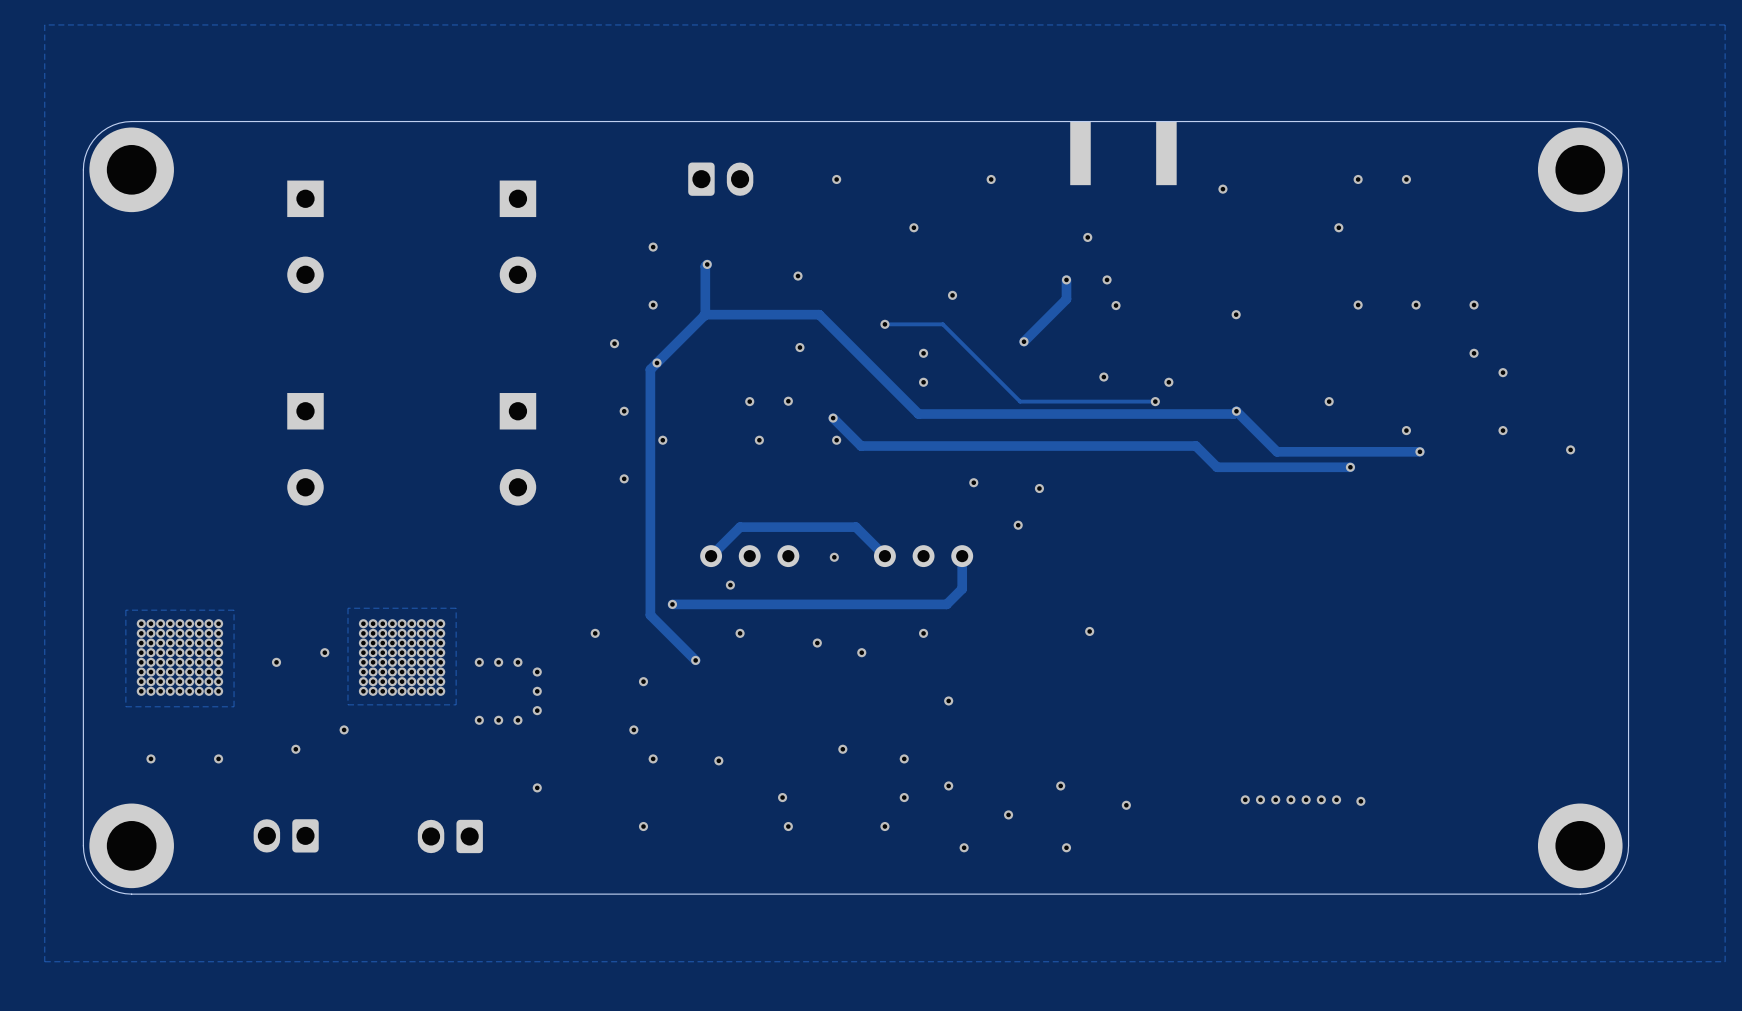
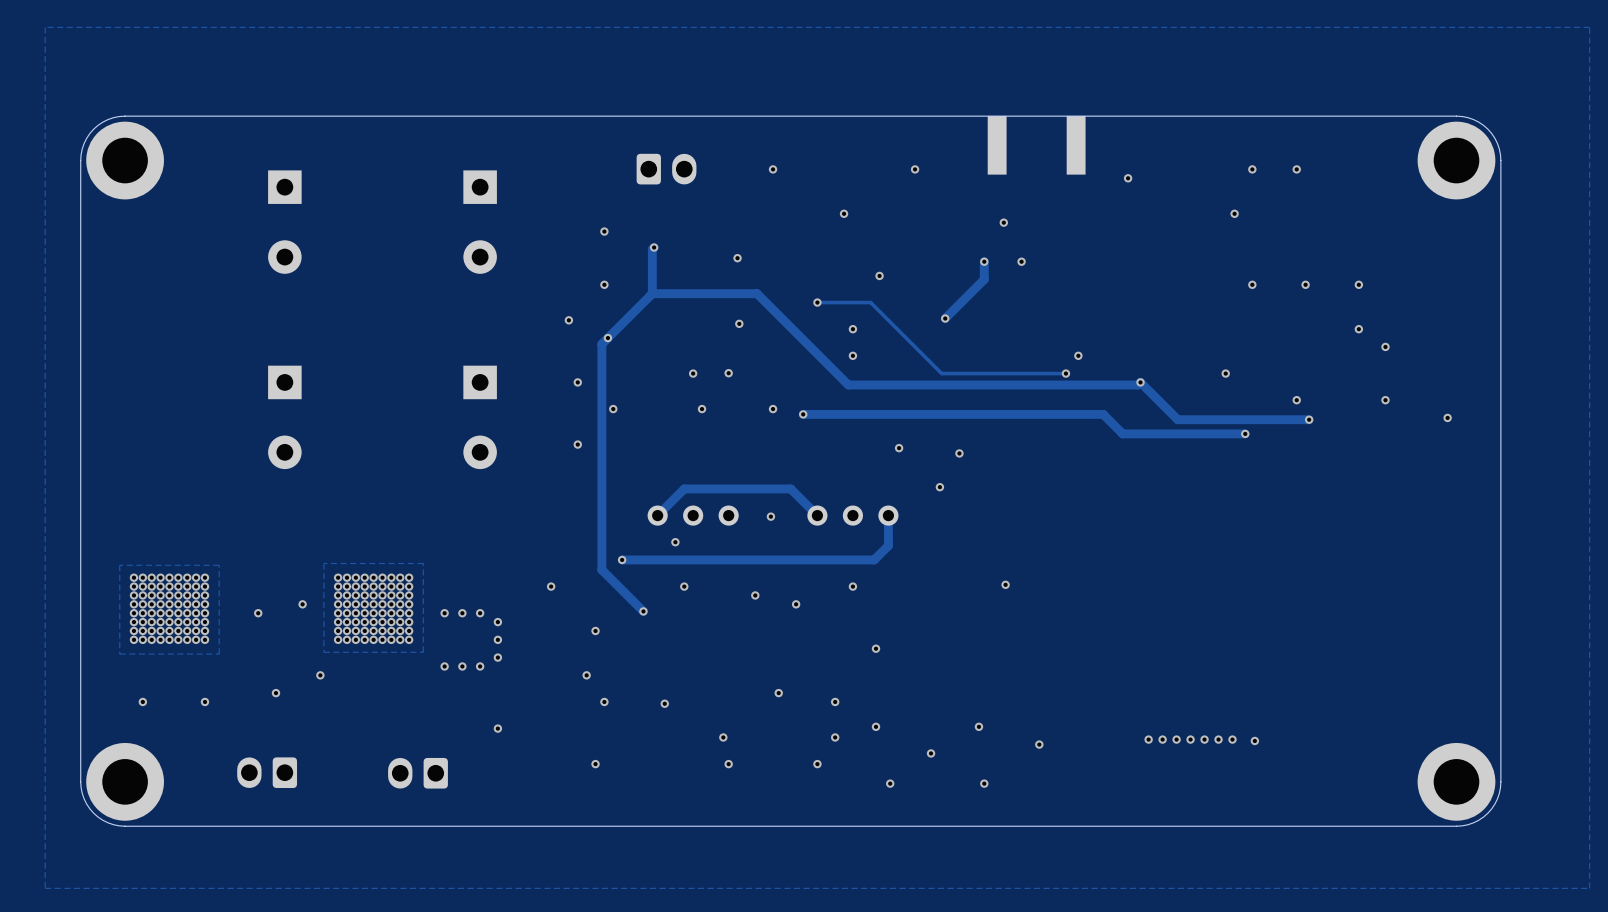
via: (1116, 305) -> none
via: (1236, 314) -> none
via: (1103, 377) -> none
track: (833, 418) (861, 446) (869, 446) -> none
via position: (833, 418) -> (803, 414)

